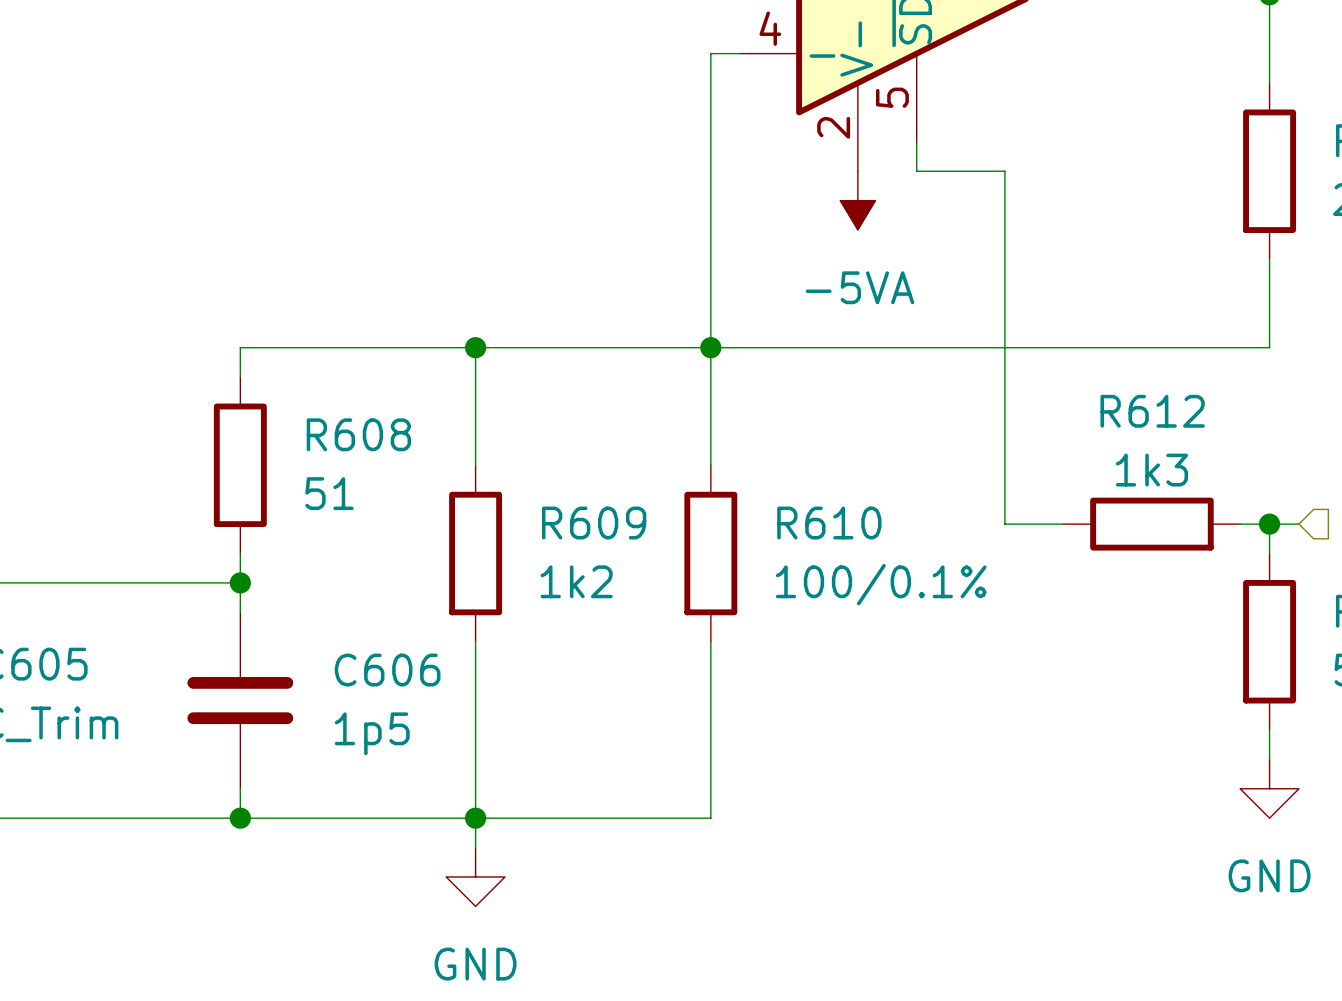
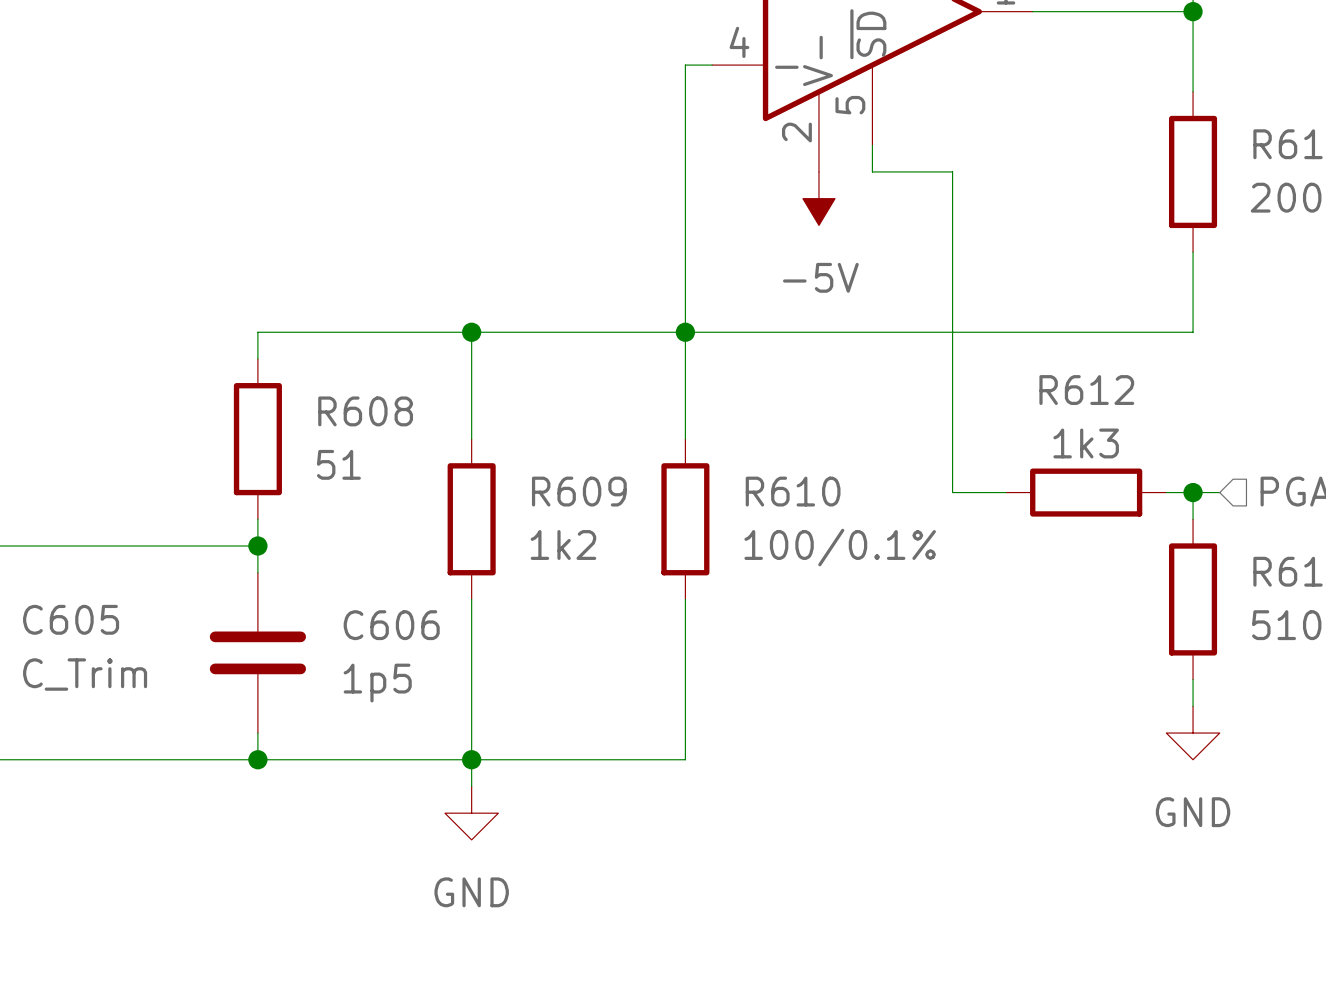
power symbol: -5VA (857, 200) -> -5V (818, 198)

